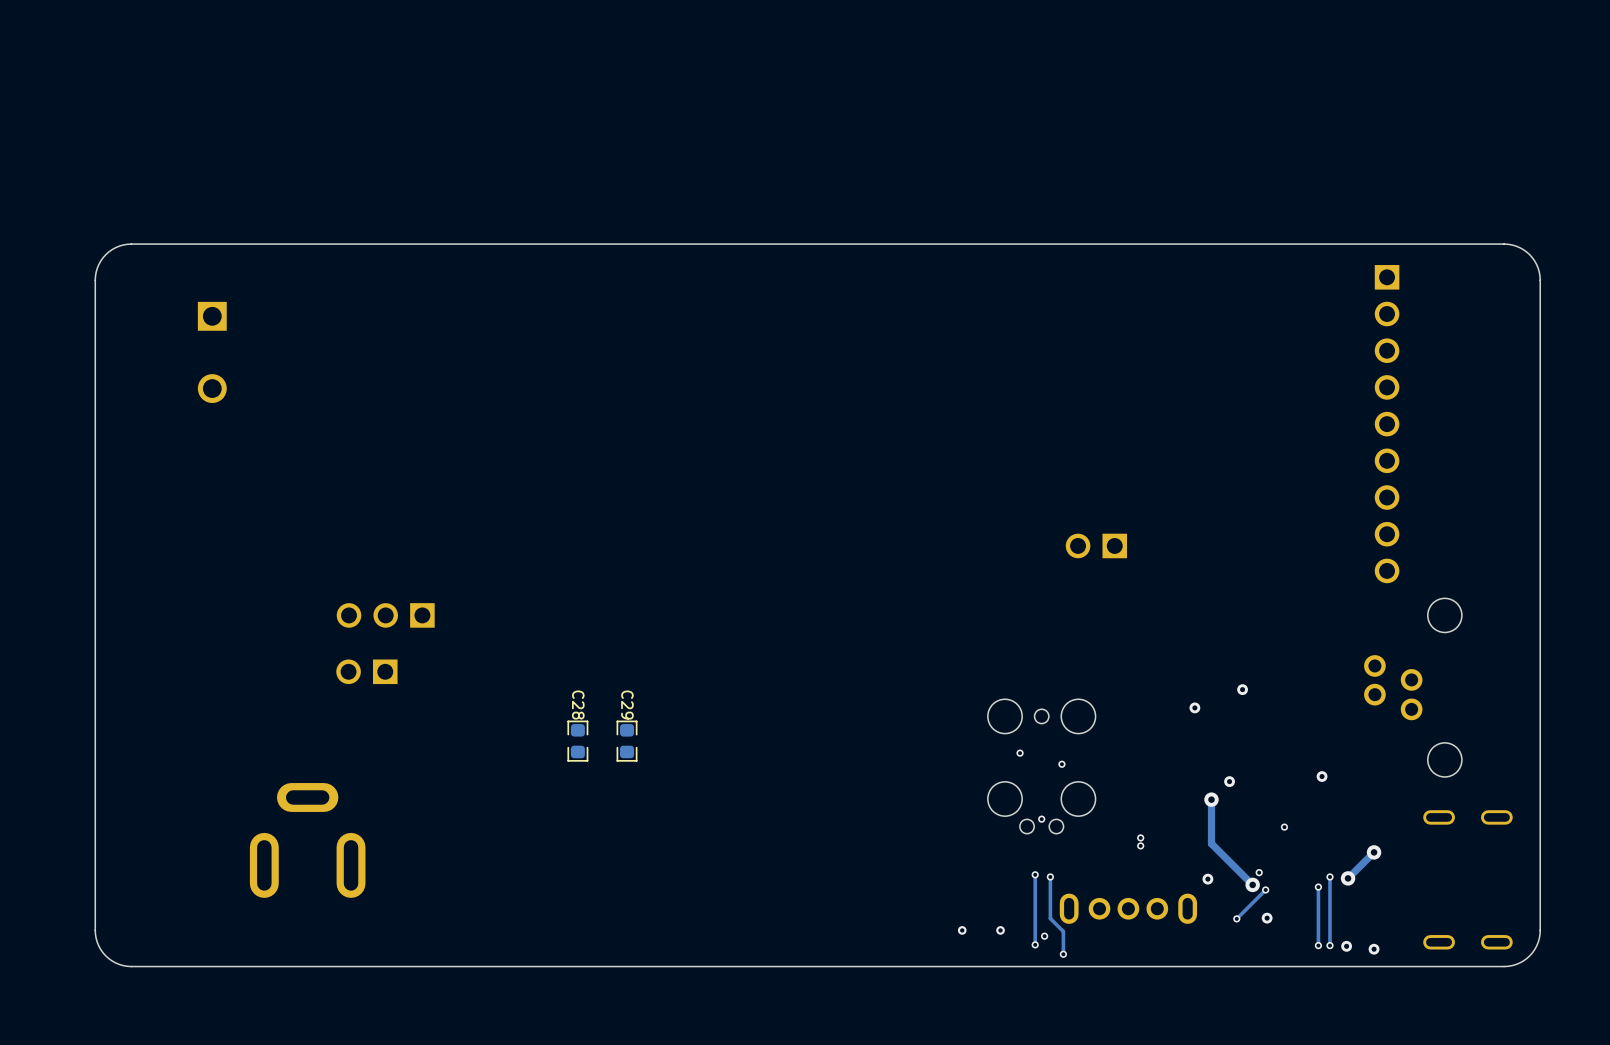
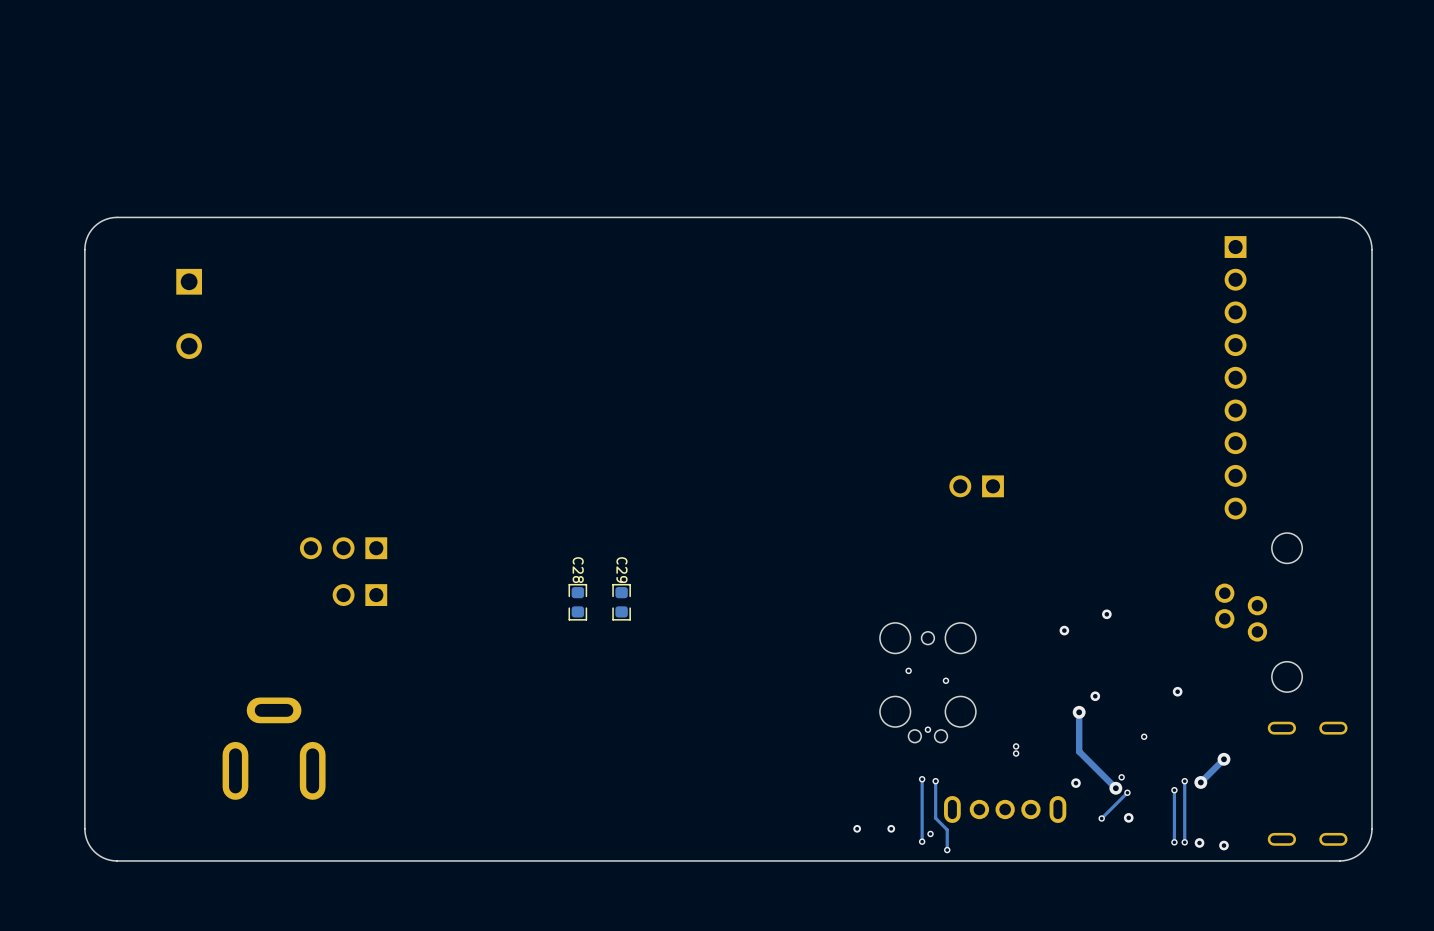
part position: (366, 671) -> (359, 595)
C28 position: (577, 741) -> (577, 602)
C29 position: (627, 741) -> (621, 602)

